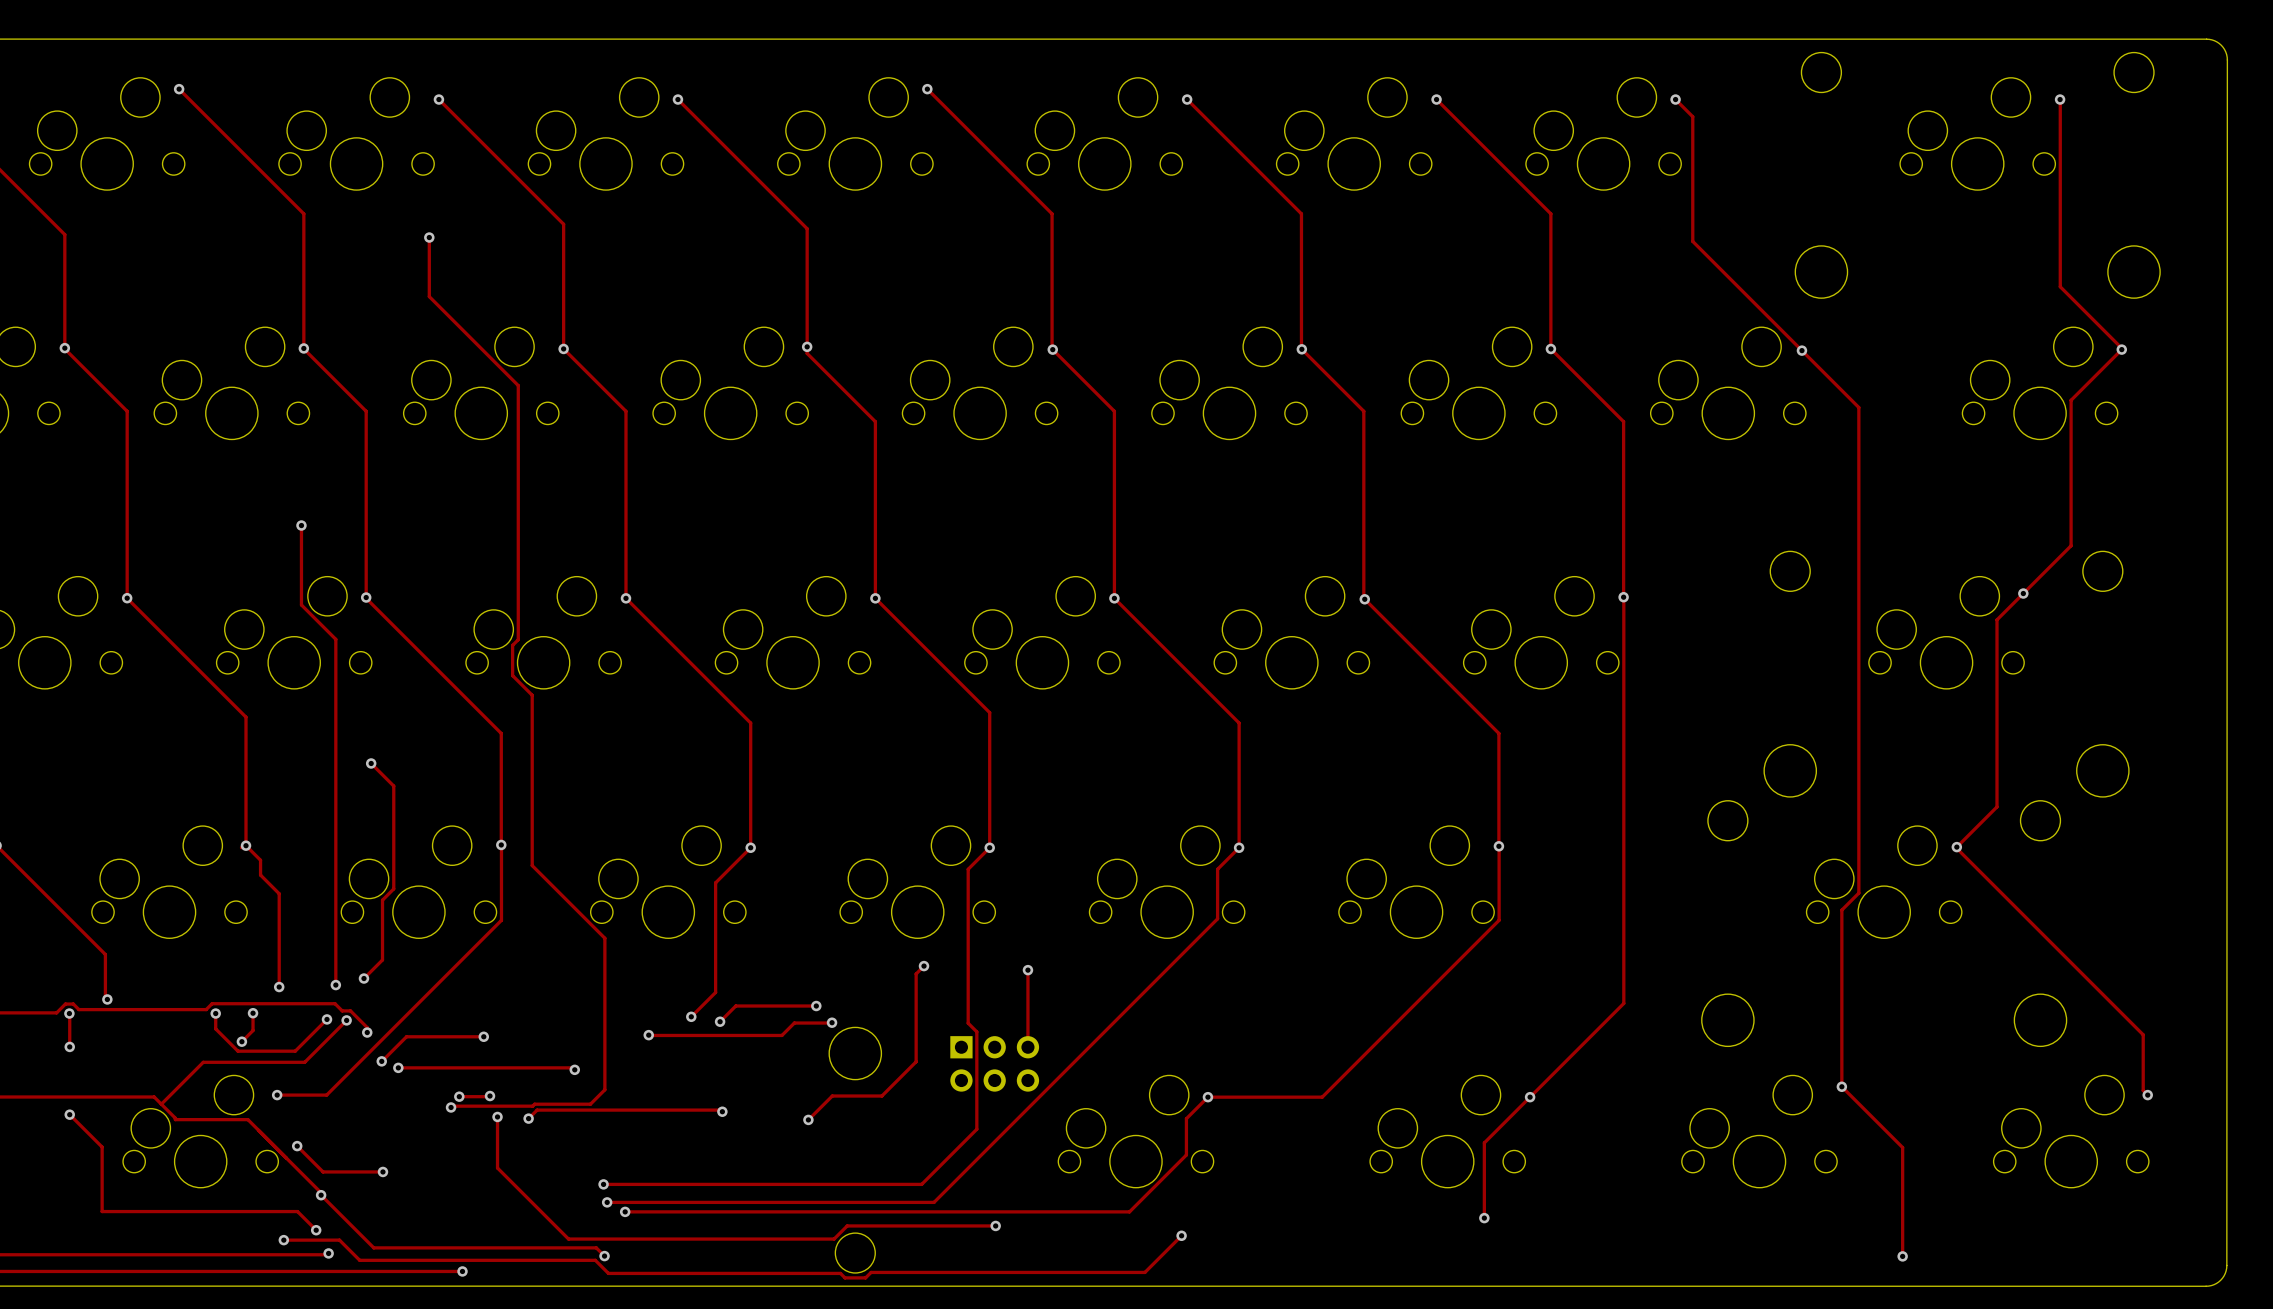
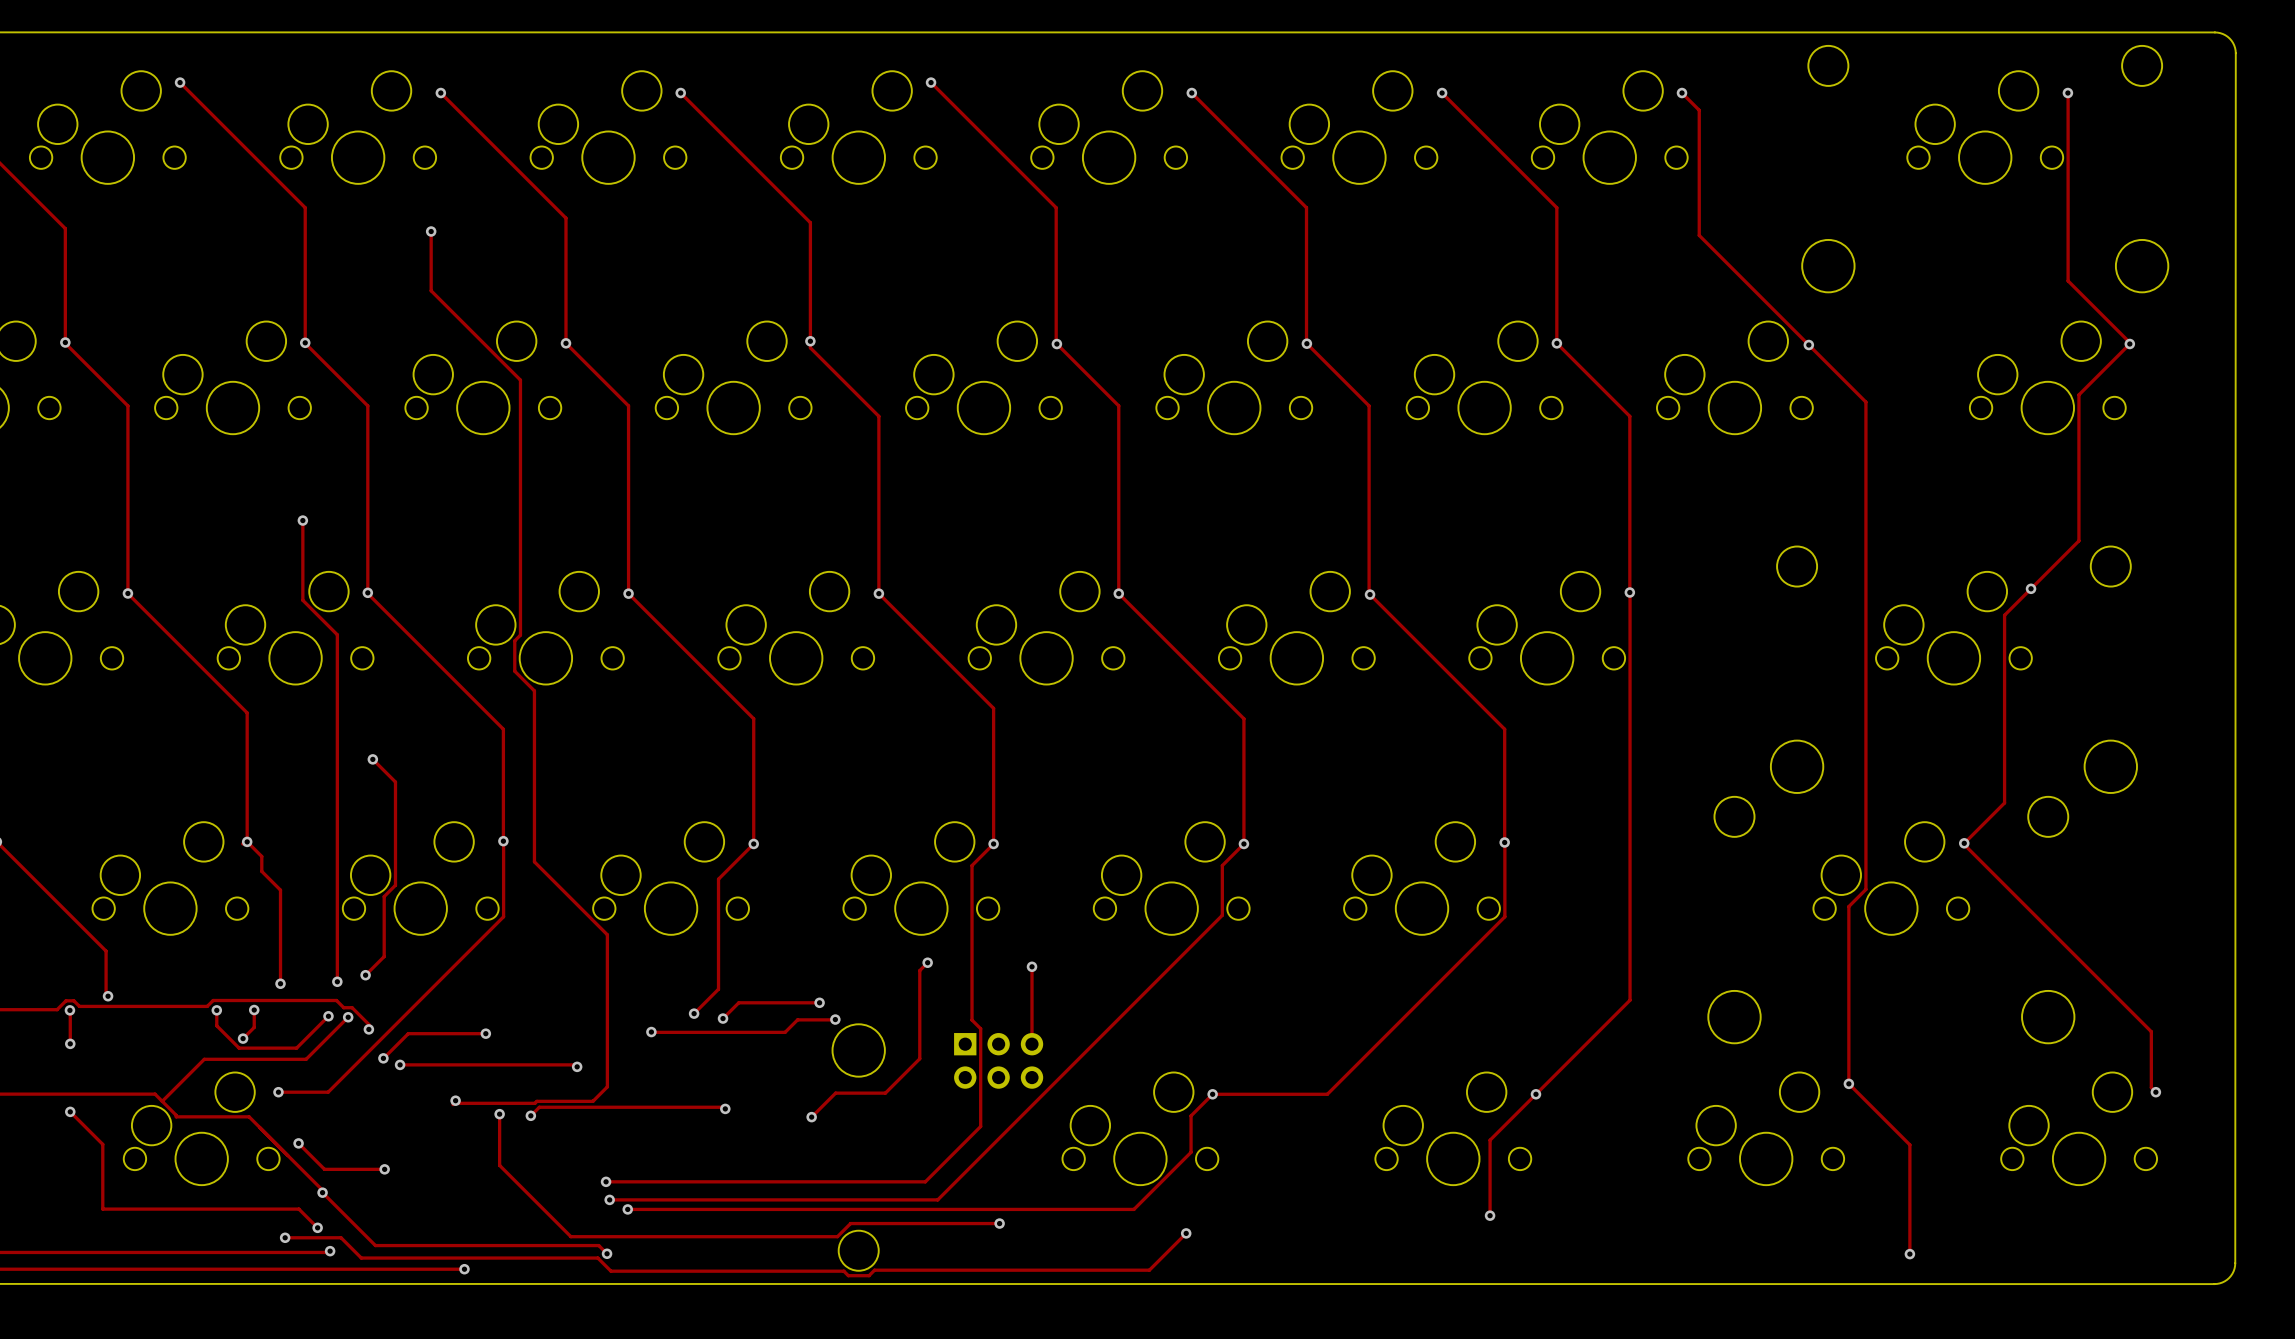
via: (459, 1096) -> none
track: (489, 1096) (459, 1096) -> none
via: (489, 1096) -> none
via: none -> (455, 1100)
via: (451, 1107) -> none

